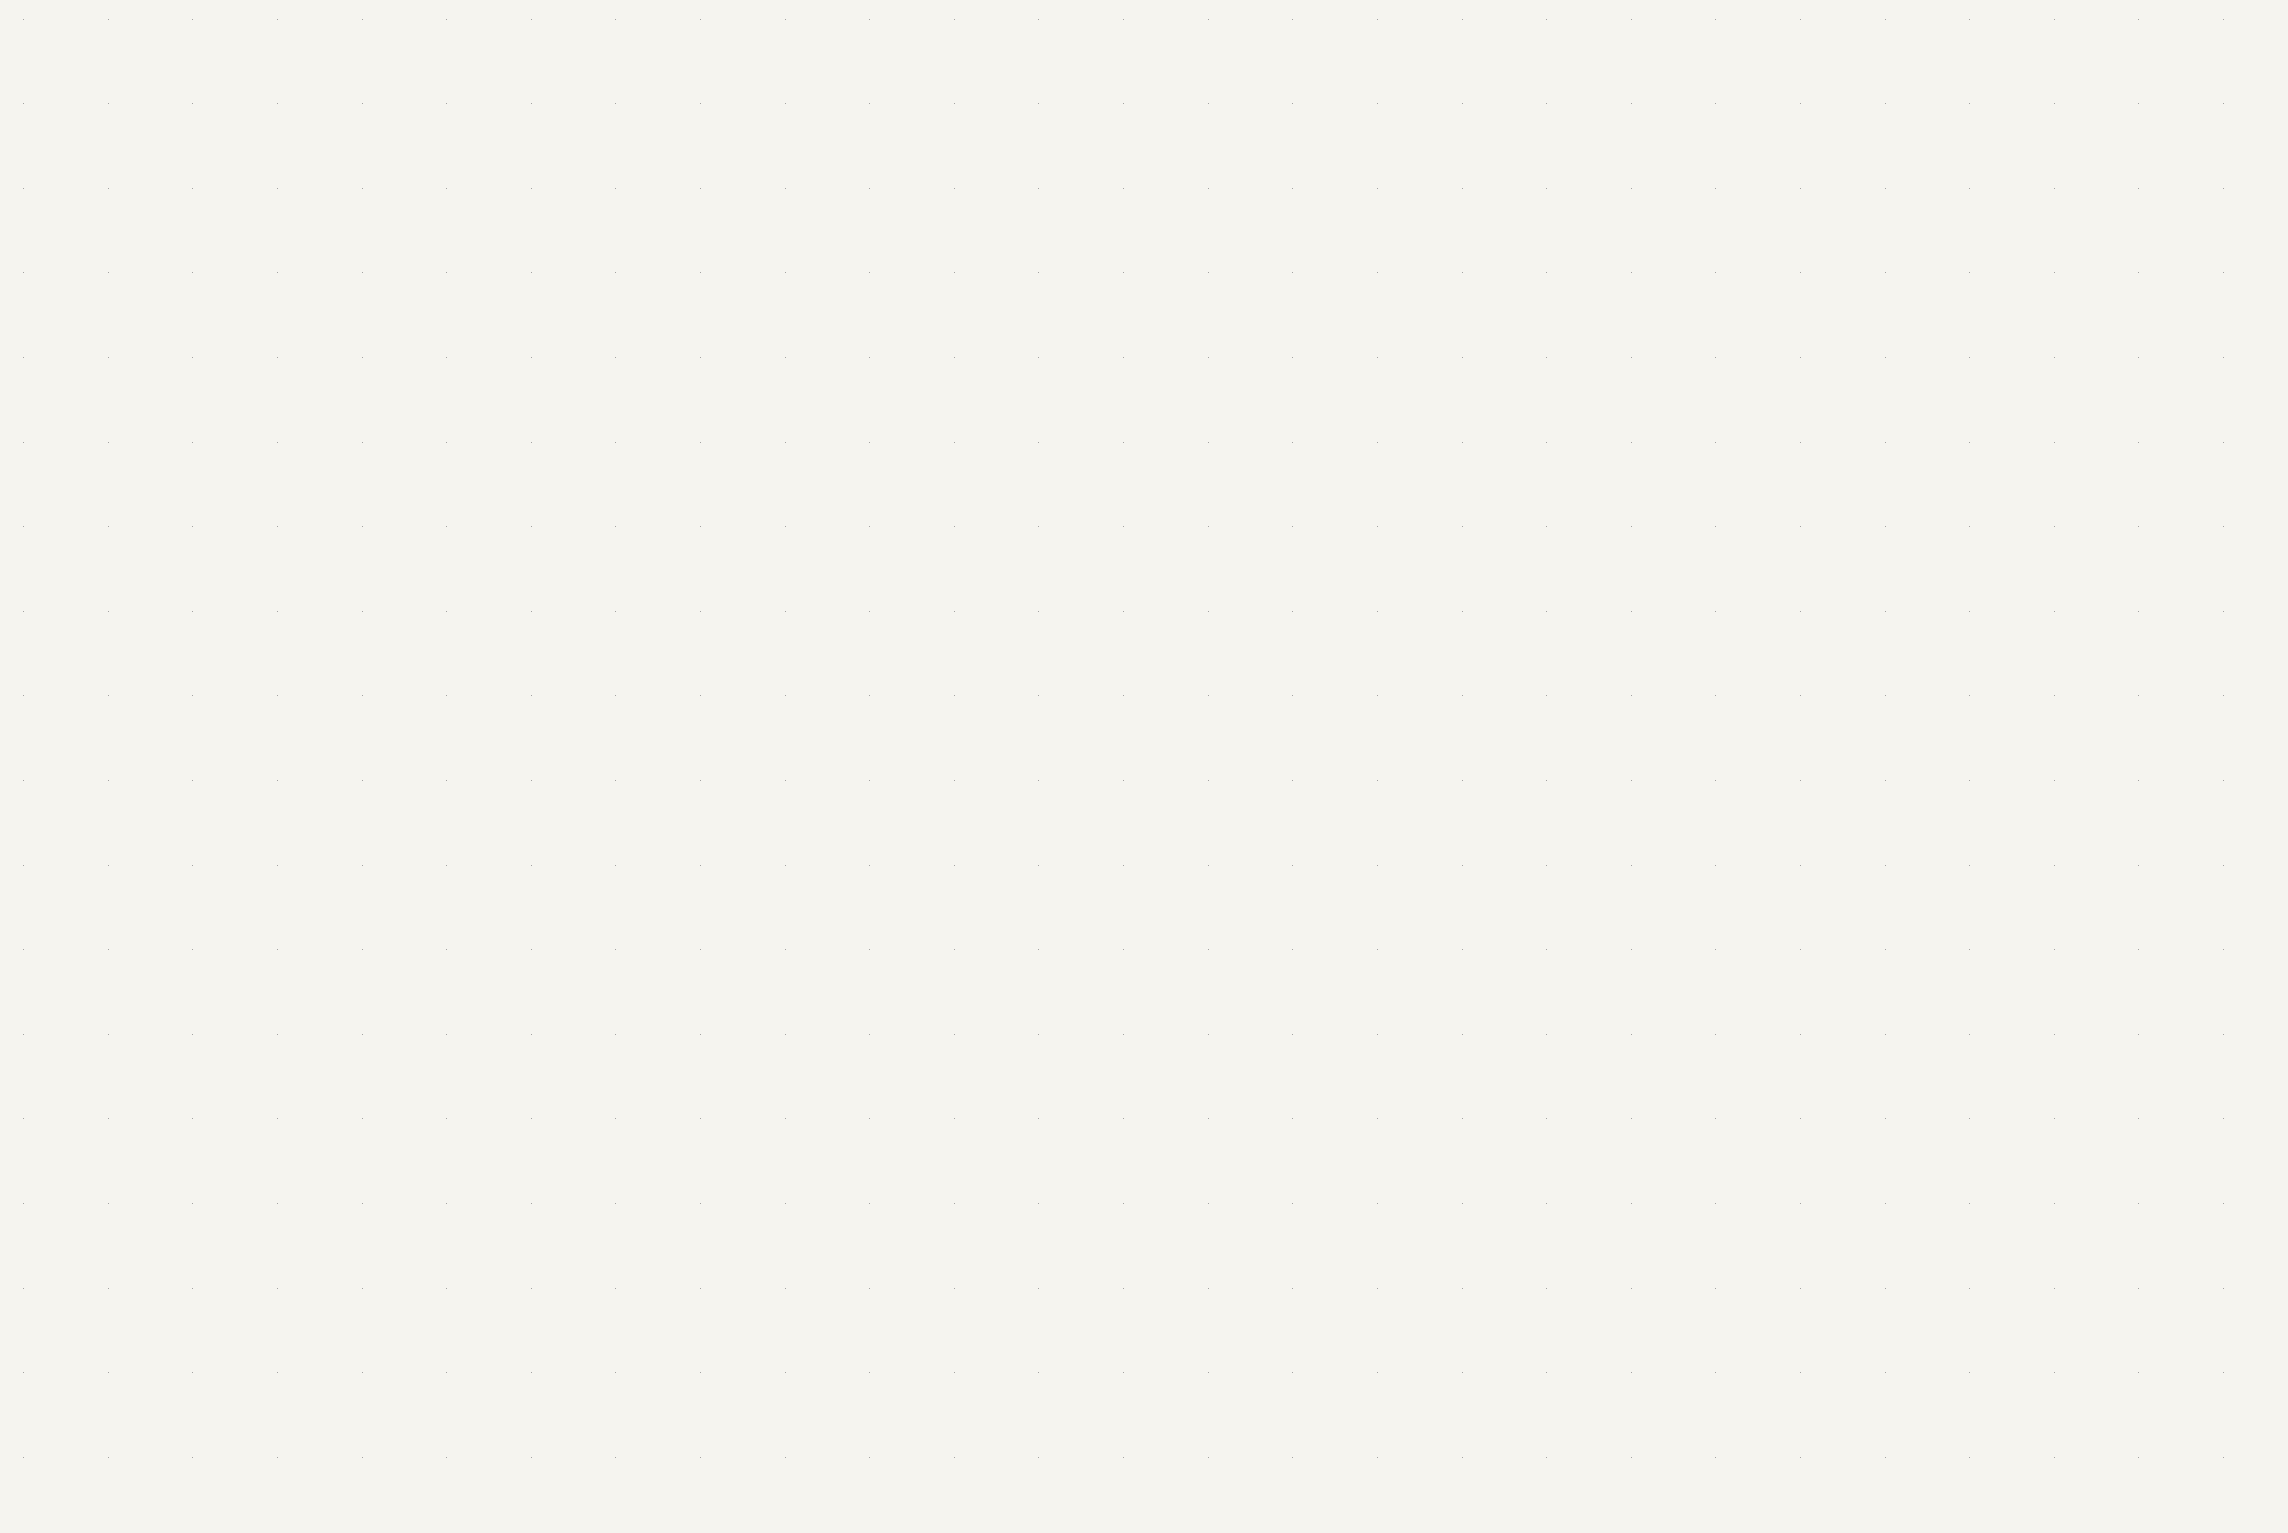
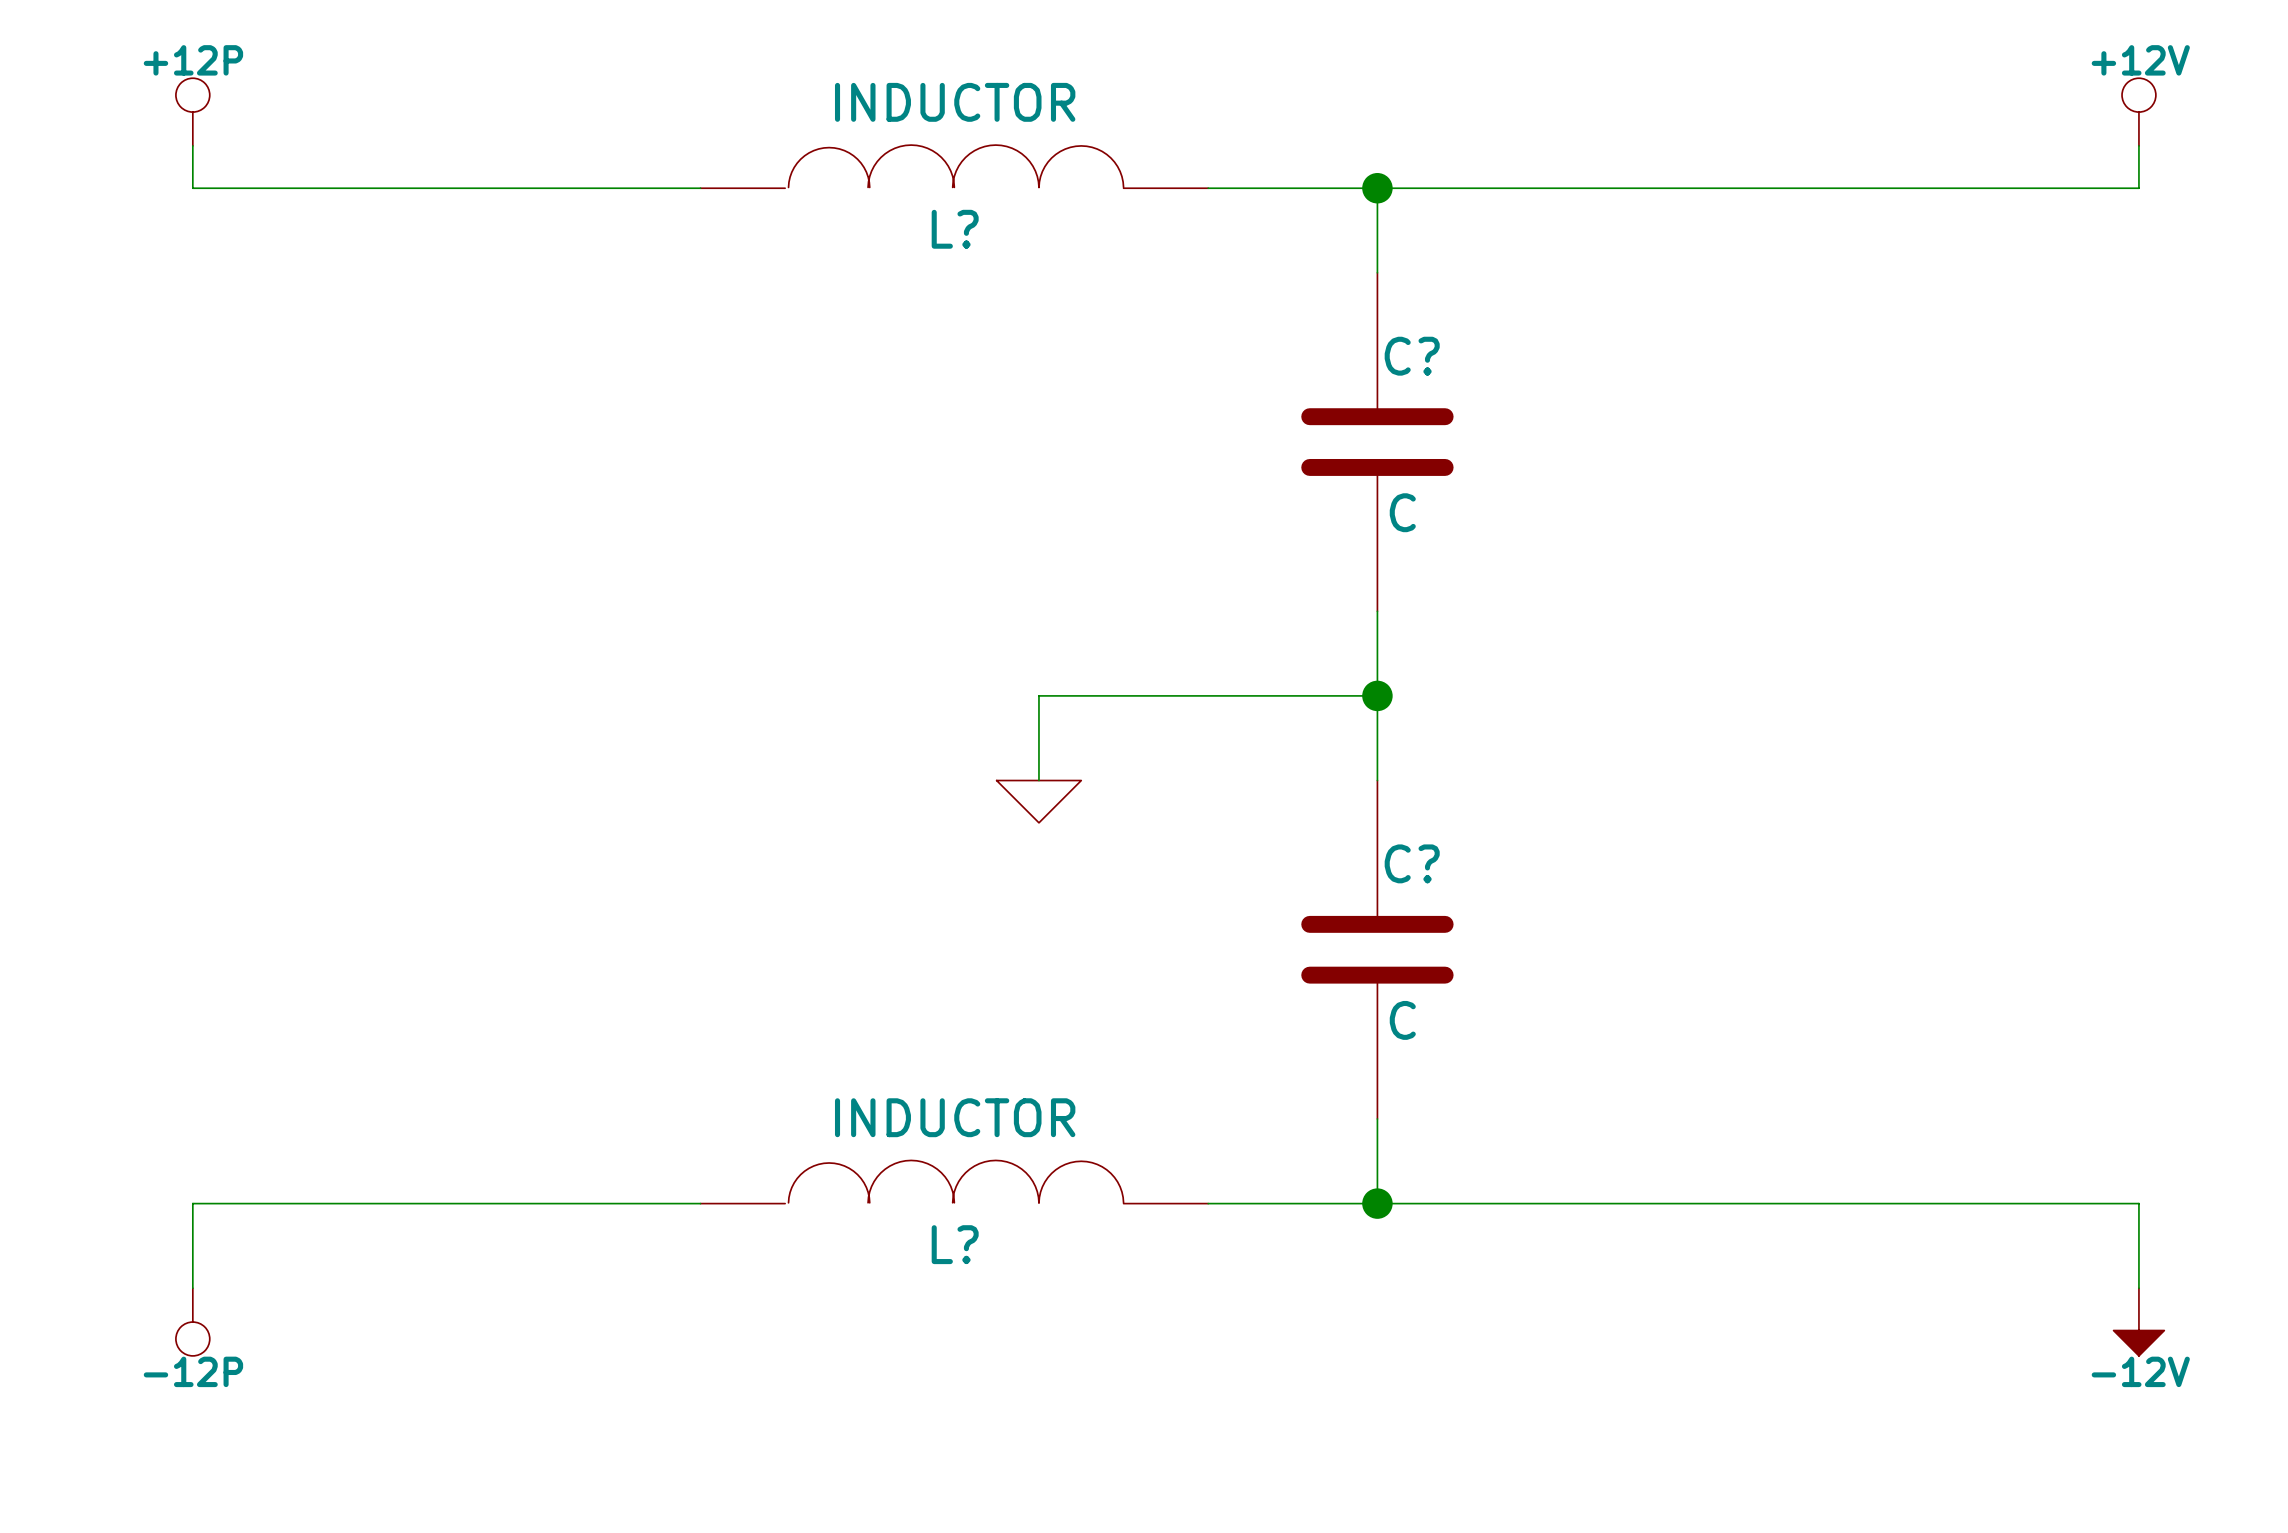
power symbol: none -> +12P (192, 112)
power symbol: none -> +12V (2138, 112)
wire: none -> (192, 145) (192, 188) (700, 188)
wire: none -> (2138, 145) (2138, 188) (1208, 188)
L?: none -> INDUCTOR (954, 166)
wire: none -> (1377, 188) (1377, 272)
junction: none -> (1377, 188)
C?: none -> C (1377, 442)
wire: none -> (1377, 611) (1377, 780)
wire: none -> (1377, 695) (1038, 695) (1038, 780)
junction: none -> (1377, 695)
power symbol: none -> (1038, 801)
C?: none -> C (1377, 949)
wire: none -> (1377, 1118) (1377, 1203)
L?: none -> INDUCTOR (954, 1182)
wire: none -> (700, 1203) (192, 1203) (192, 1288)
wire: none -> (1208, 1203) (2138, 1203) (2138, 1288)
junction: none -> (1377, 1203)
power symbol: none -> -12P (192, 1322)
power symbol: none -> -12V (2138, 1322)

